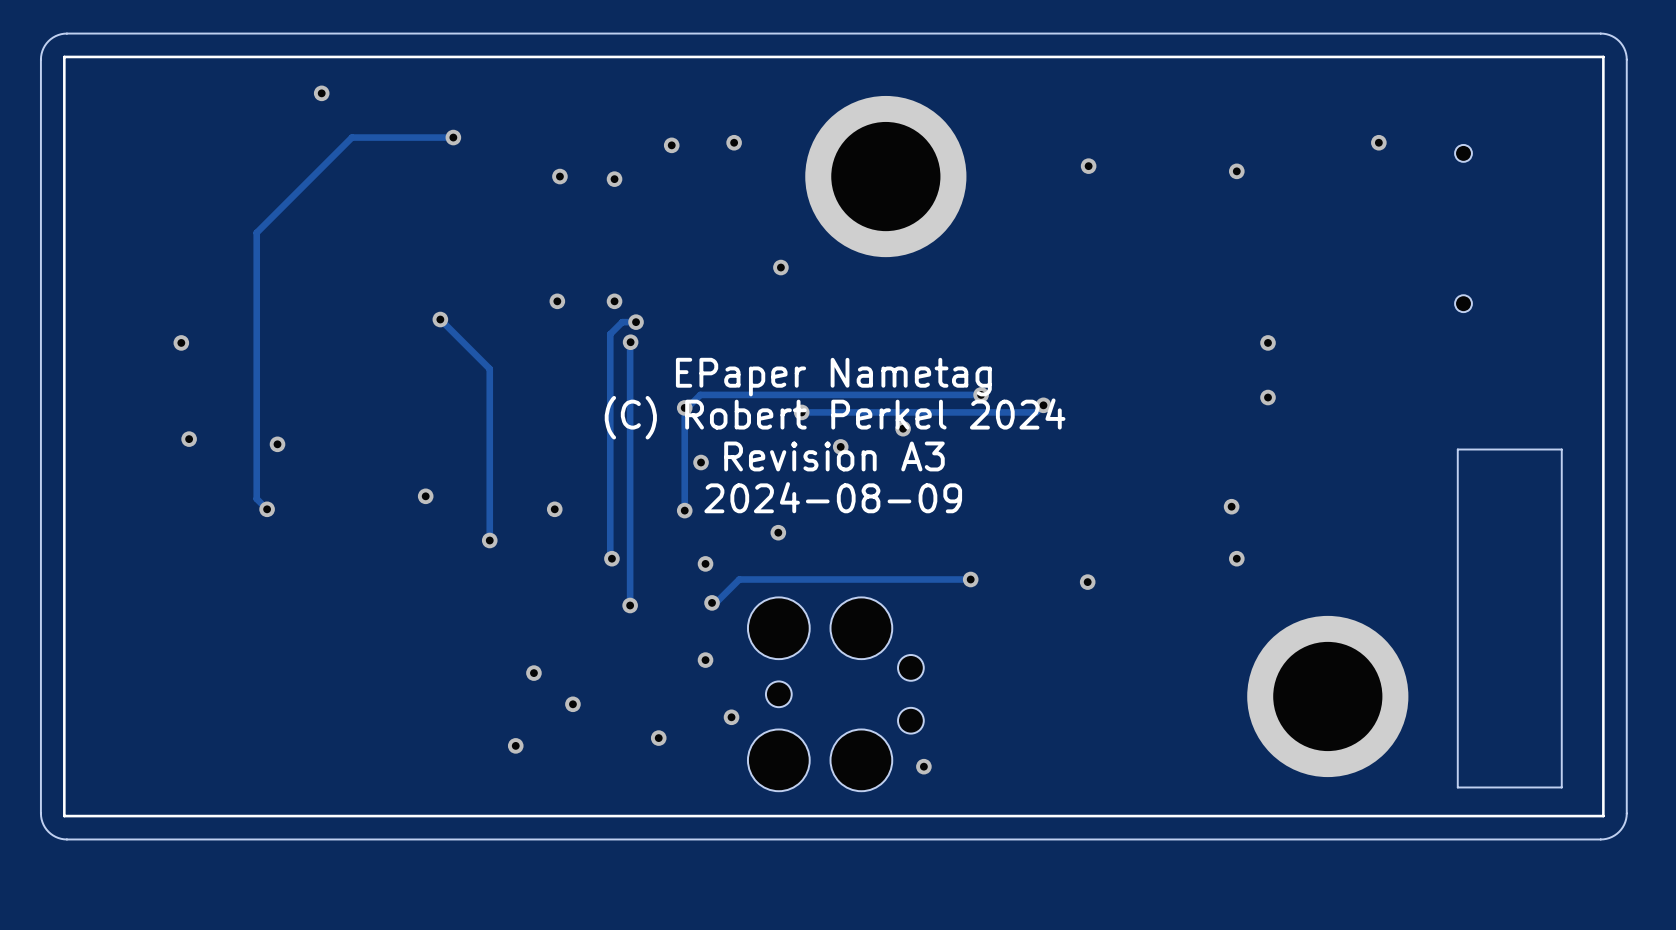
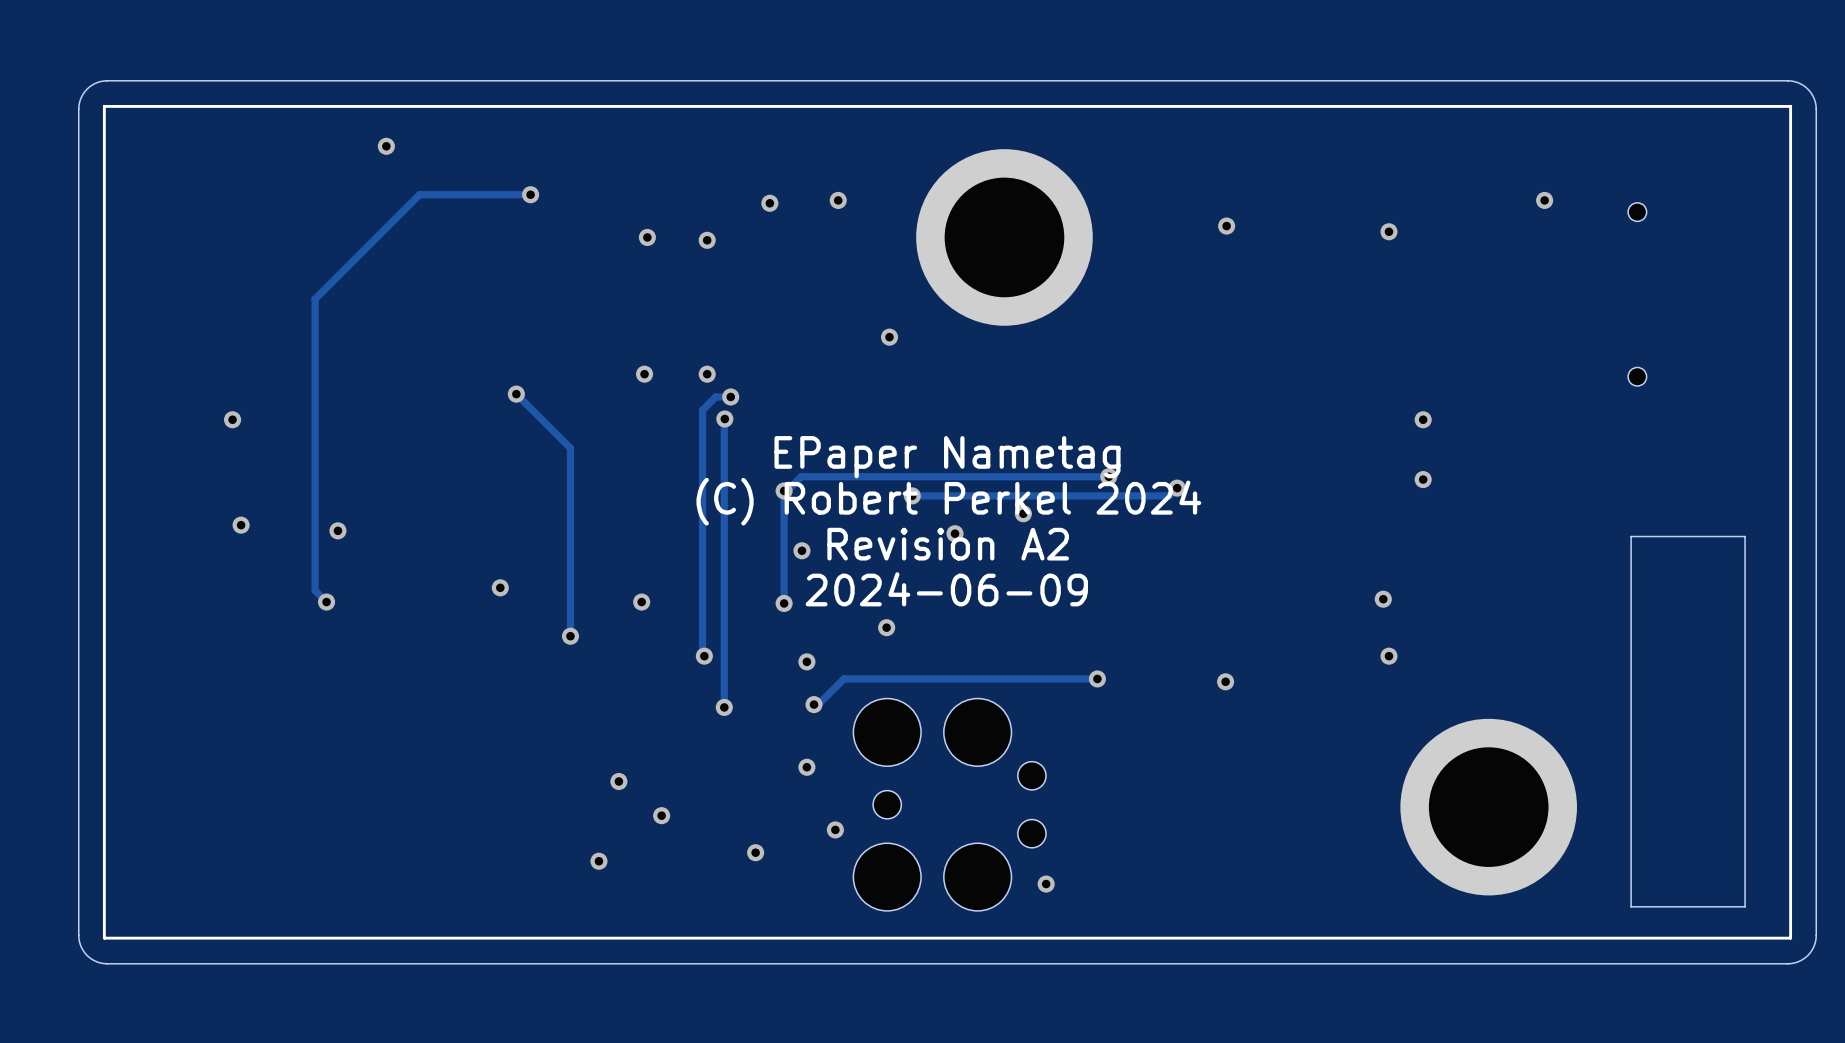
text: Revision A3 (834, 456) -> Revision A2 (948, 544)
text: 2024-08-09 (833, 497) -> 2024-06-09 (946, 589)

